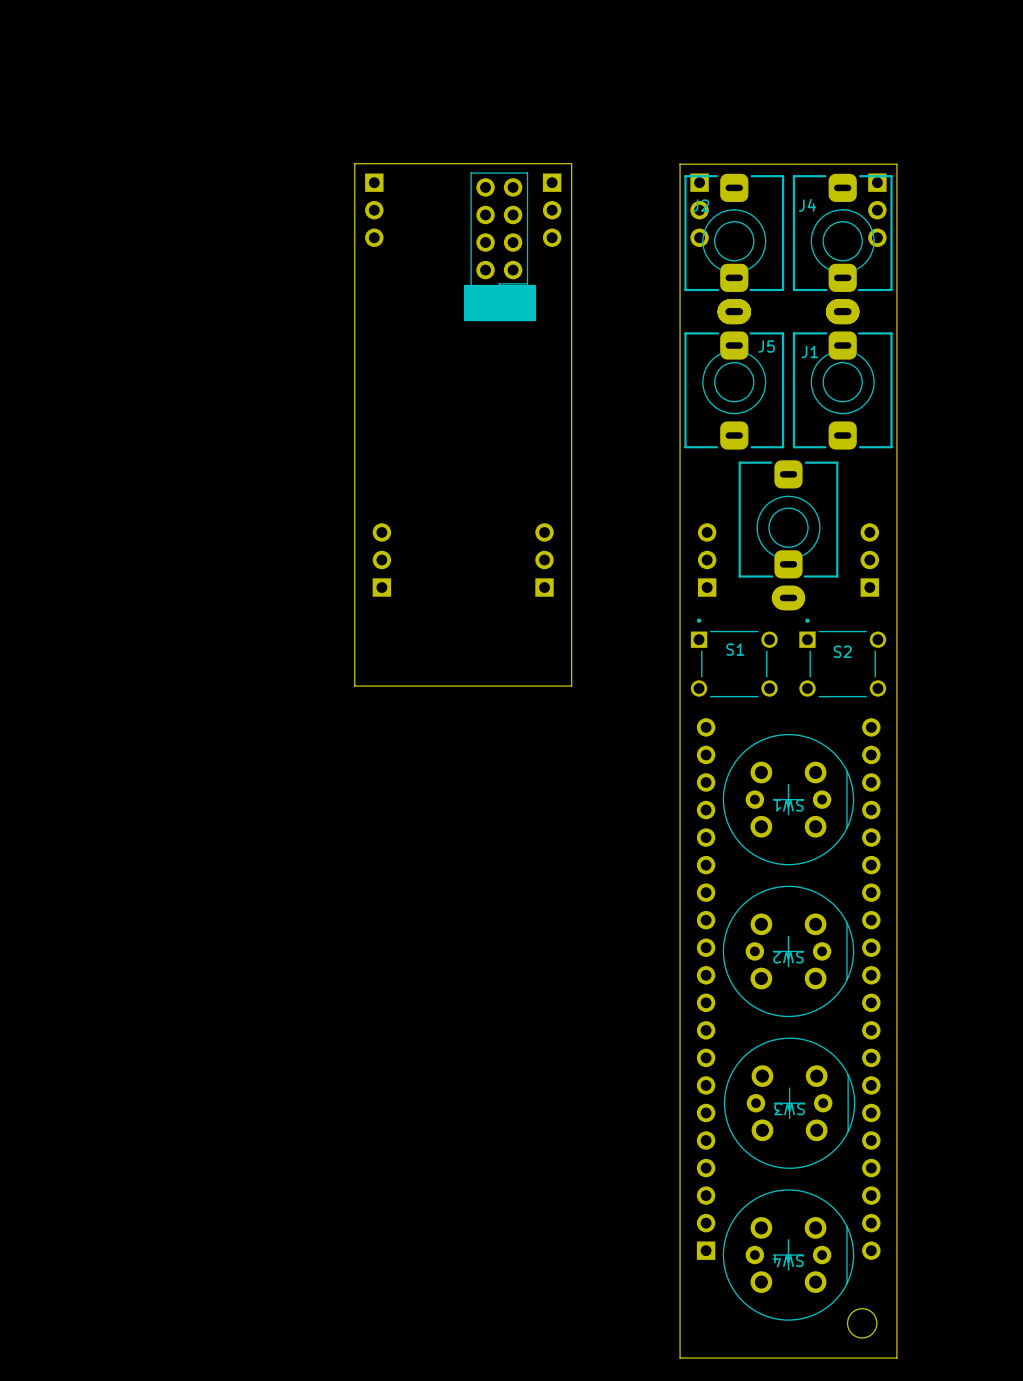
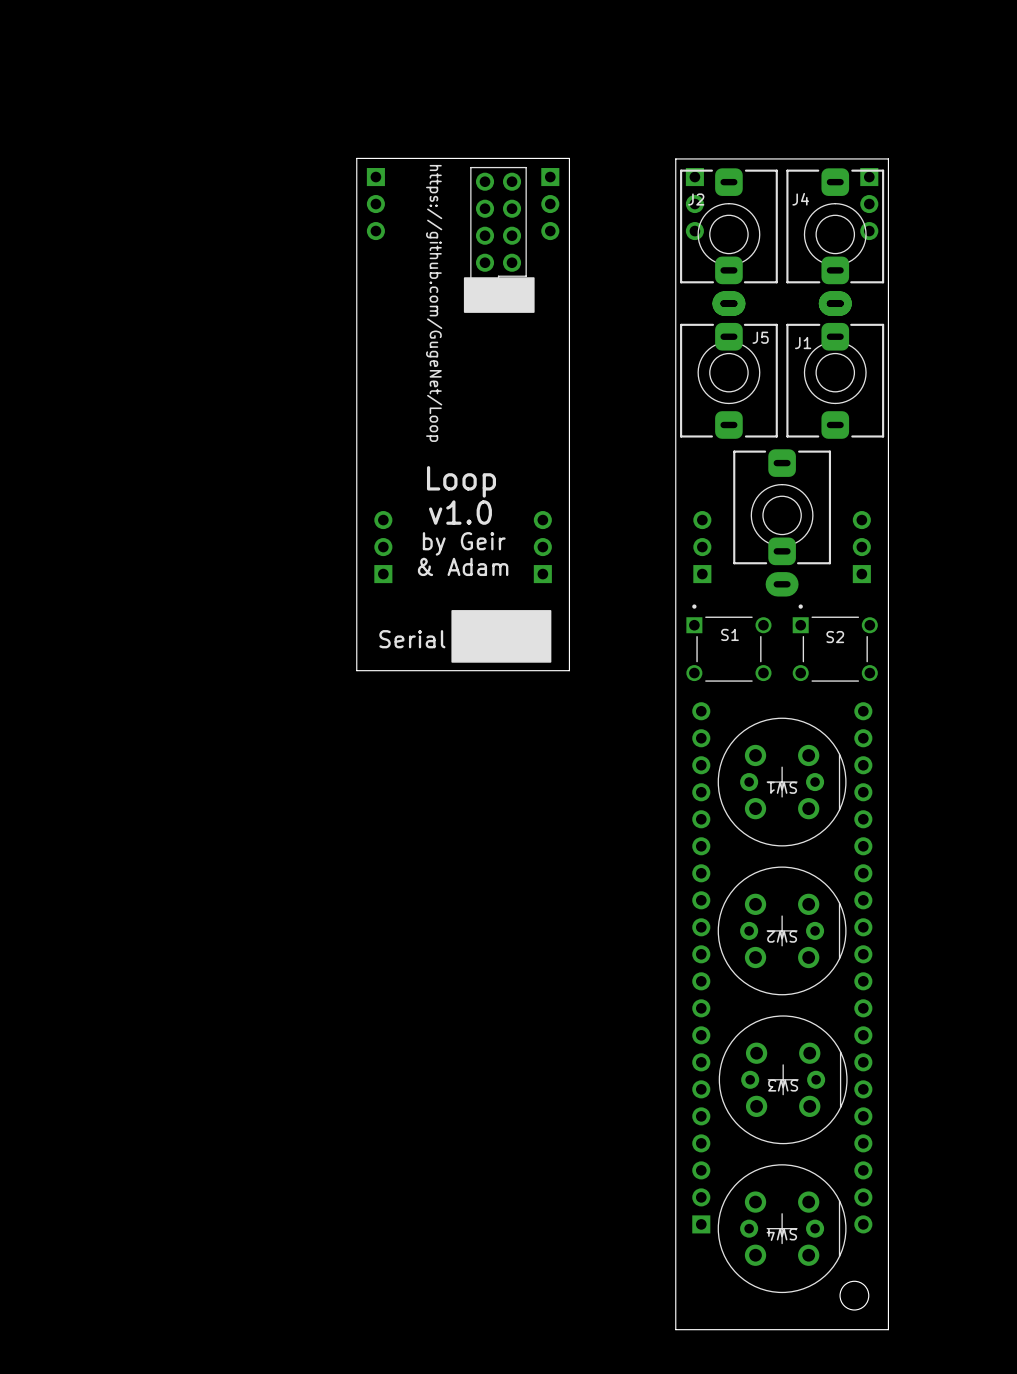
text: none -> https://github.com/GugeNet/Loop (434, 303)
text: none -> Loop (461, 481)
text: none -> v1.0 (460, 512)
text: none -> by Geir (464, 543)
text: none -> & Adam (463, 566)
drawing: none -> [451, 610, 552, 663]
text: none -> Serial (412, 639)

